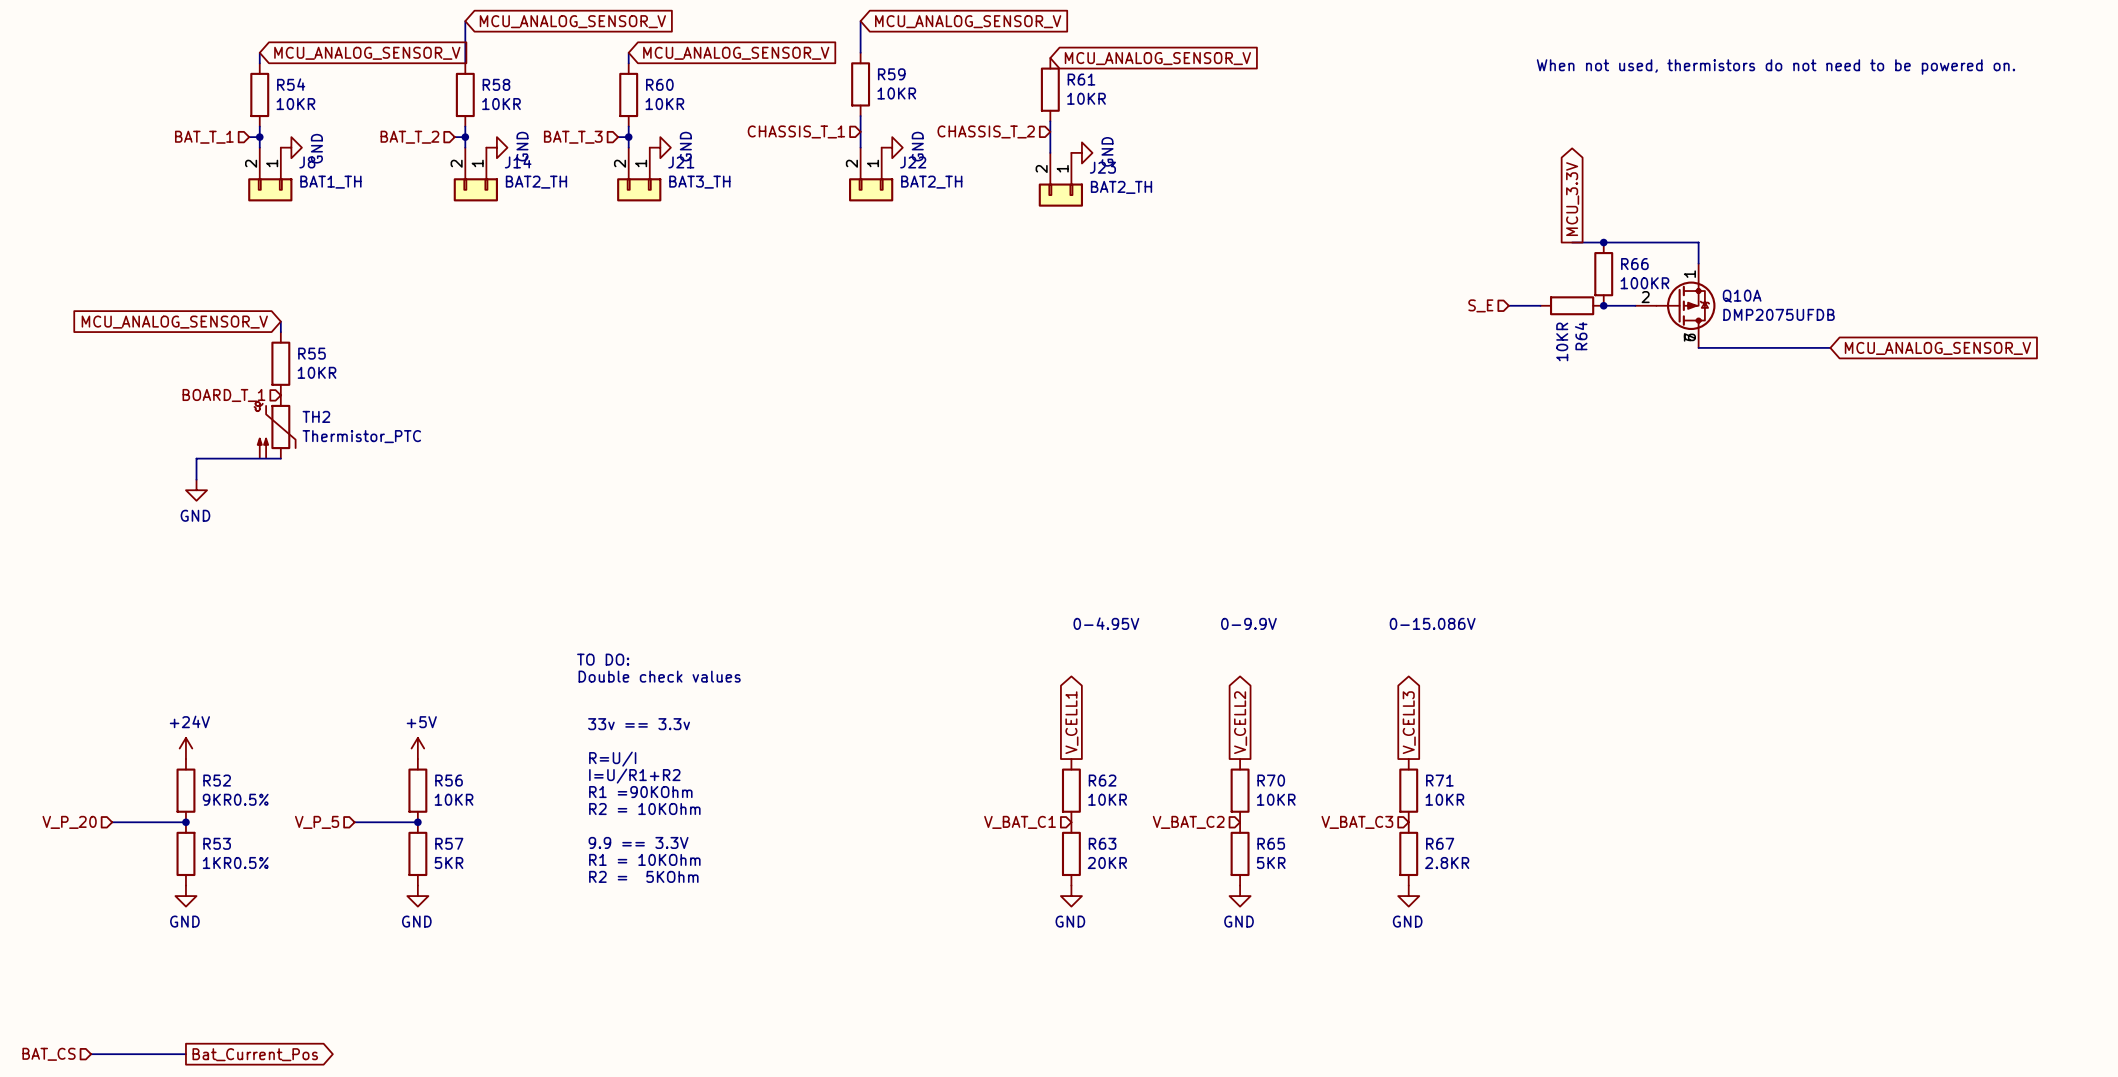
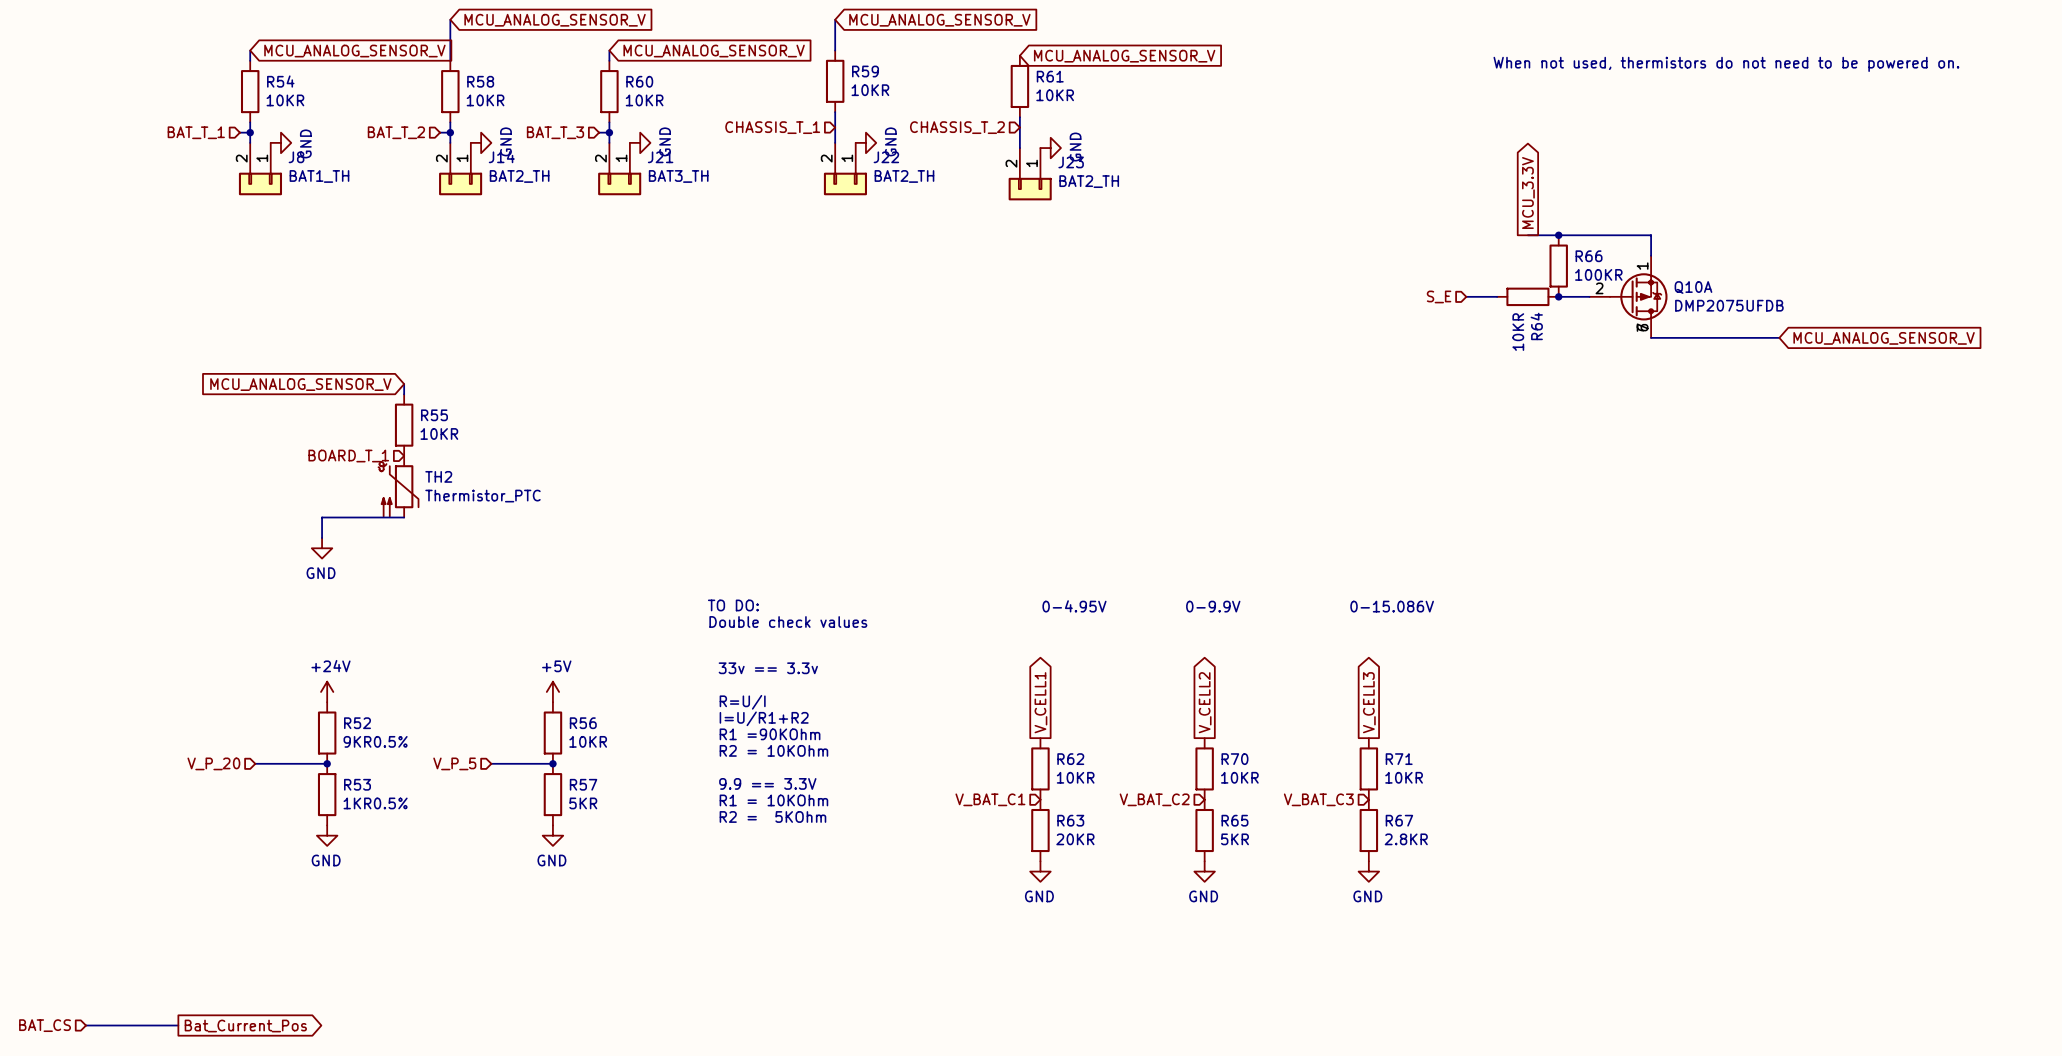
wire: (280, 321) (280, 332) -> (404, 384) (404, 394)
global label position: MCU_ANALOG_SENSOR_V (174, 322) -> MCU_ANALOG_SENSOR_V (300, 384)
R55 position: (280, 363) -> (404, 425)
hierarchical label position: BOARD_T_1 (223, 395) -> BOARD_T_1 (348, 456)
TH2 position: (275, 426) -> (398, 486)
wire: (280, 458) (196, 458) (196, 479) -> (404, 517) (322, 517) (322, 538)
power symbol position: GND (196, 490) -> GND (322, 548)
text position: TO DO: (603, 659) -> TO DO: (733, 605)
text position: Double check values (659, 676) -> Double check values (788, 621)
text position: 33v == 3.3v (639, 724) -> 33v == 3.3v (768, 668)
power symbol position: +24V (185, 748) -> +24V (327, 691)
power symbol position: +5V (417, 748) -> +5V (552, 691)
text position: R=U/I (612, 759) -> R=U/I (742, 702)
text position: I=U/R1+R2 (634, 776) -> I=U/R1+R2 (764, 718)
junction: none -> (327, 763)
junction: none -> (552, 763)
R52 position: (185, 790) -> (327, 733)
R56 position: (417, 790) -> (552, 733)
text position: R1 =90KOhm (640, 792) -> R1 =90KOhm (770, 734)
text position: R2 = 10KOhm (644, 809) -> R2 = 10KOhm (773, 750)
hierarchical label position: V_P_20 (69, 822) -> V_P_20 (213, 763)
wire: (112, 822) (185, 822) -> (255, 763) (327, 763)
junction: (185, 822) -> none
hierarchical label position: V_P_5 (317, 822) -> V_P_5 (454, 763)
wire: (354, 822) (417, 822) -> (491, 763) (552, 763)
junction: (417, 822) -> none
text position: 9.9 == 3.3V (638, 842) -> 9.9 == 3.3V (767, 783)
R53 position: (185, 853) -> (327, 794)
R57 position: (417, 853) -> (552, 794)
power symbol: none -> GND (327, 835)
power symbol: none -> GND (552, 835)
text position: R1 = 10KOhm (644, 859) -> R1 = 10KOhm (773, 800)
text position: R2 = 5KOhm (643, 876) -> R2 = 5KOhm (772, 816)
power symbol: GND (185, 896) -> none
power symbol: GND (417, 896) -> none

